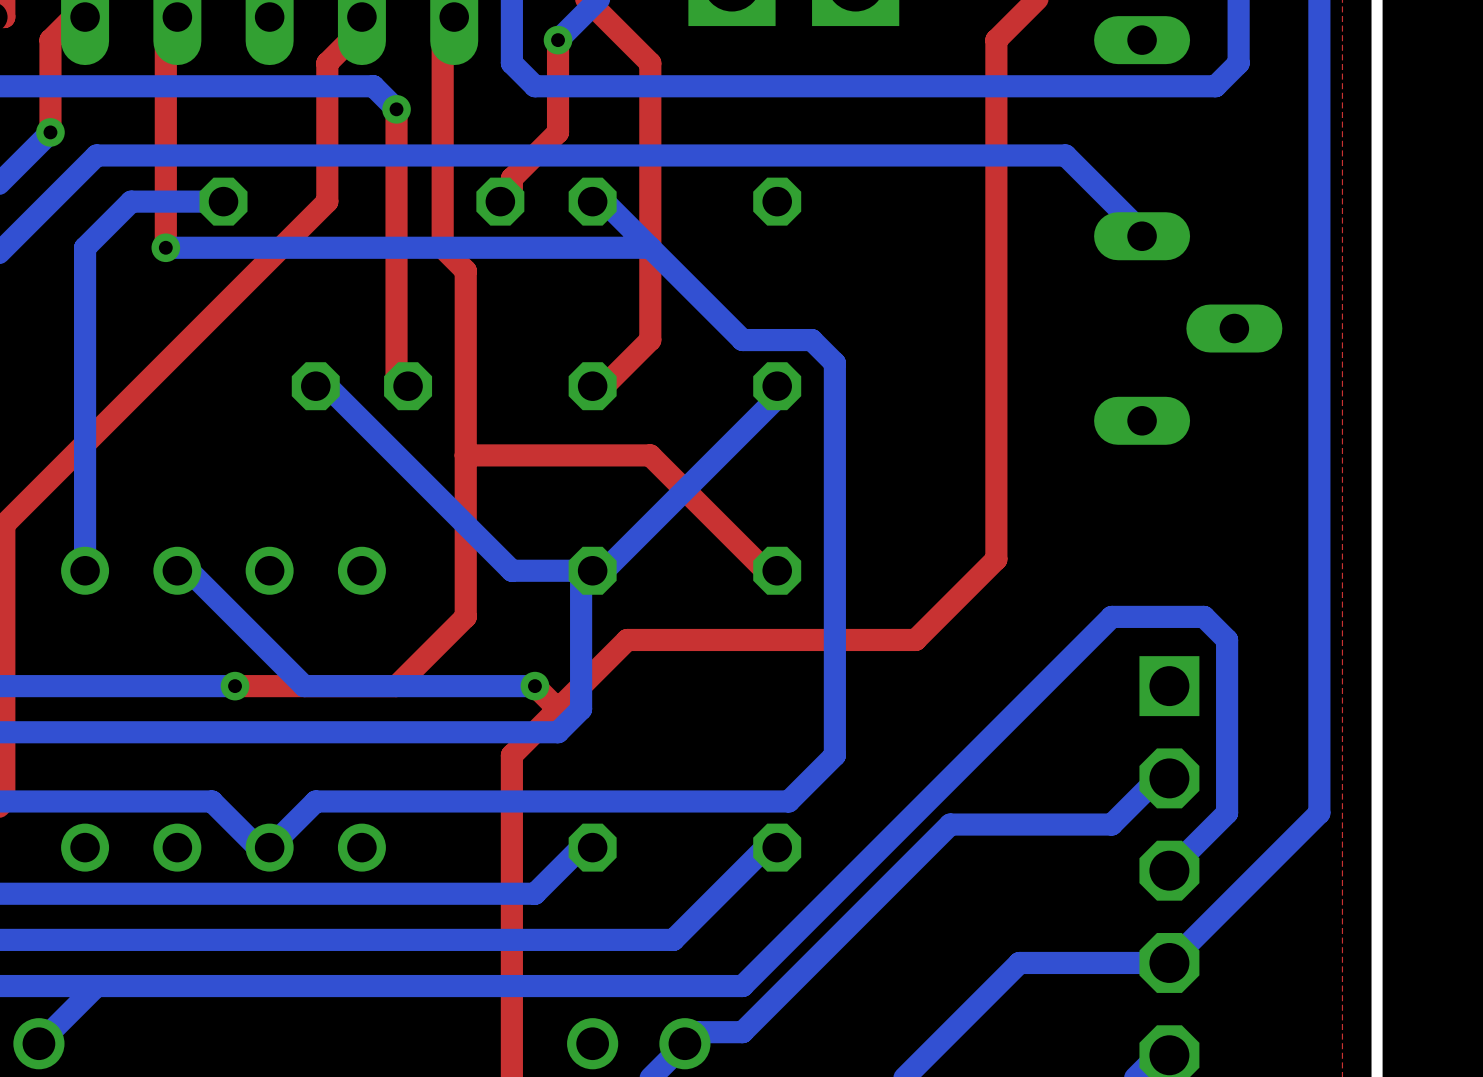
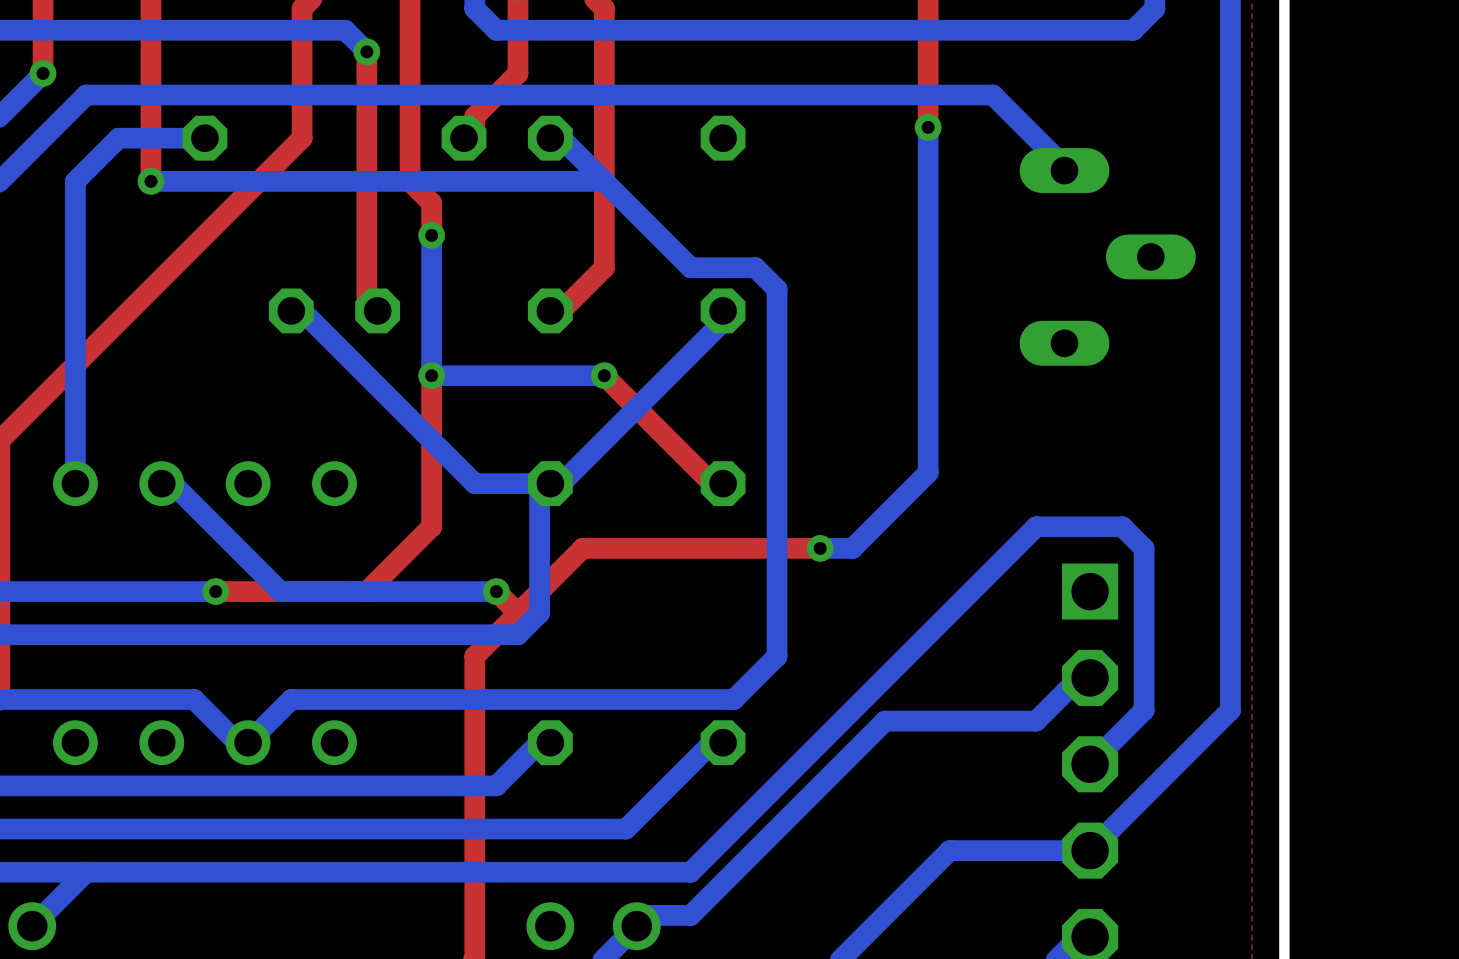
top track: (996, 190) (996, 559) (915, 639) (881, 639) -> none
bottom track: none -> (928, 127) (928, 472) (852, 548) (820, 548)
via: none -> (928, 127)
top track: (465, 305) (465, 455) (650, 455) -> none
bottom track: none -> (431, 235) (431, 375) (604, 375)
via: none -> (431, 235)
via: none -> (431, 375)
via: none -> (604, 375)
via: none -> (820, 548)

